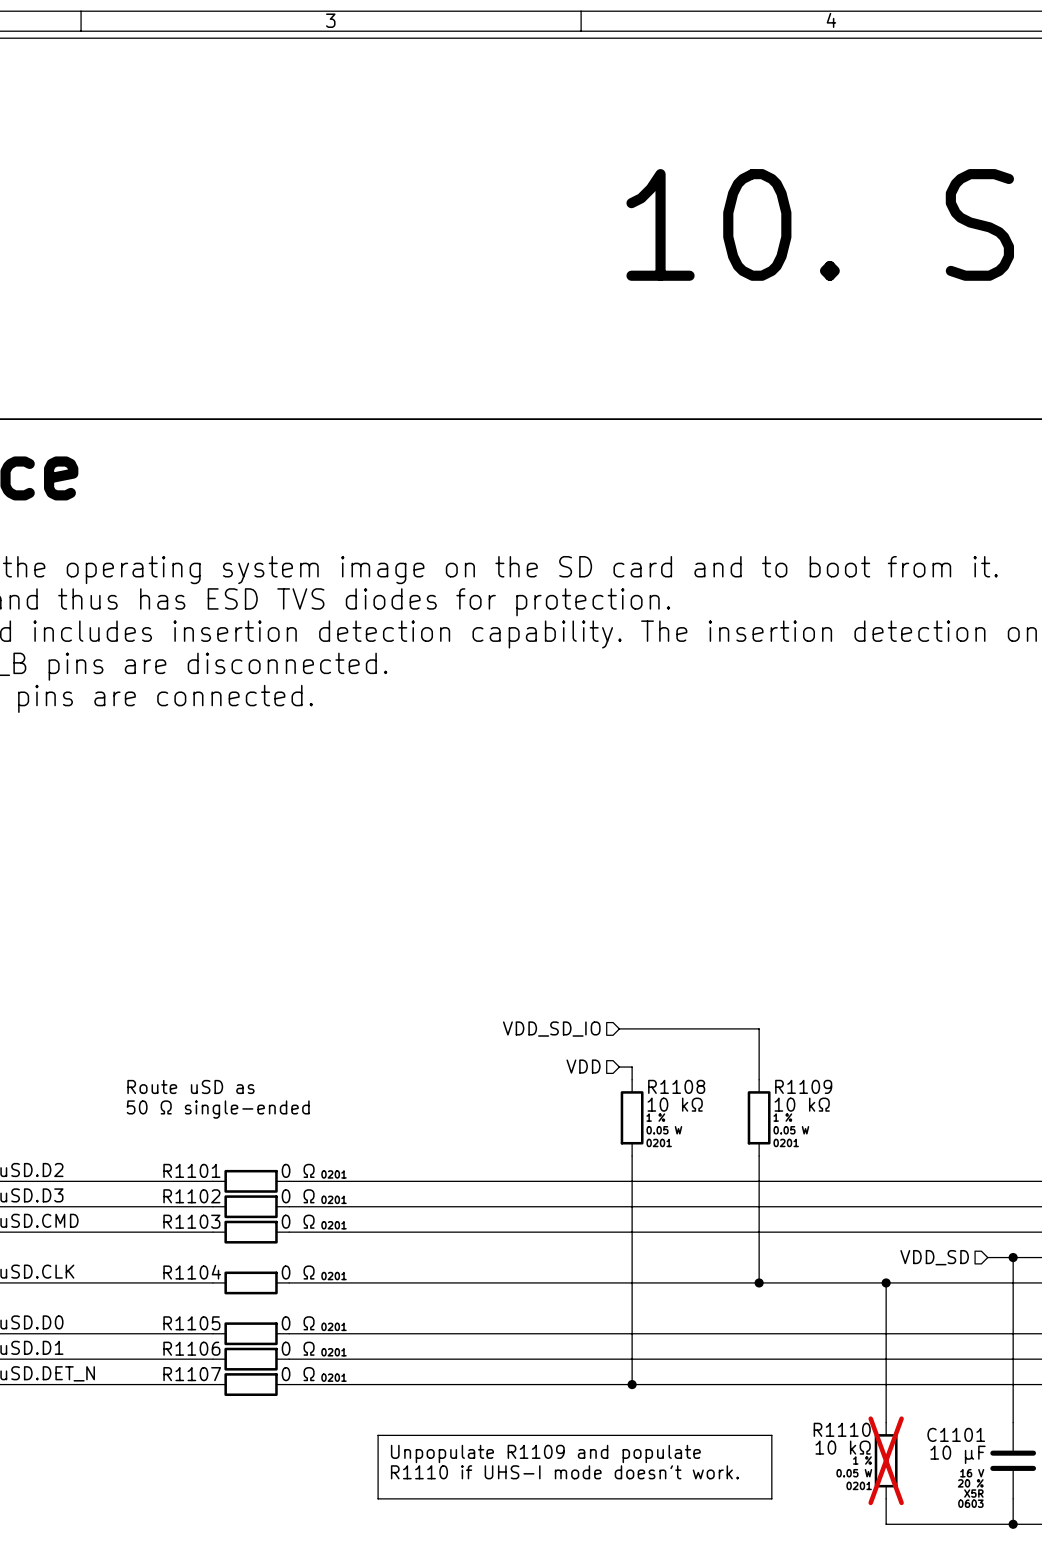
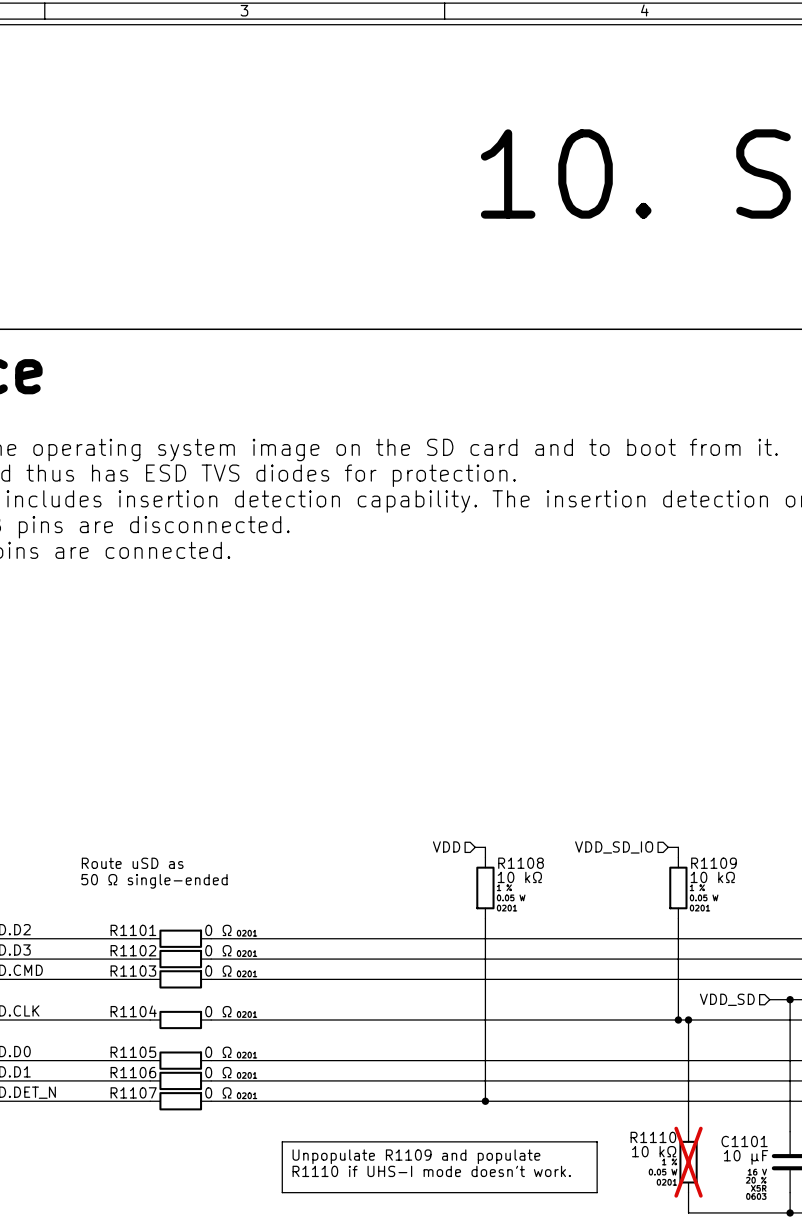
wire: (619, 1028) (759, 1028) (759, 1079) -> none
hierarchical label position: VDD_SD_IO (551, 1029) -> VDD_SD_IO (614, 847)
wire: none -> (668, 847) (678, 847) (678, 857)
R1109 position: (759, 1117) -> (678, 887)
wire: (759, 1155) (759, 1282) -> (678, 918) (678, 1020)
junction: (759, 1282) -> none
junction: none -> (678, 1020)

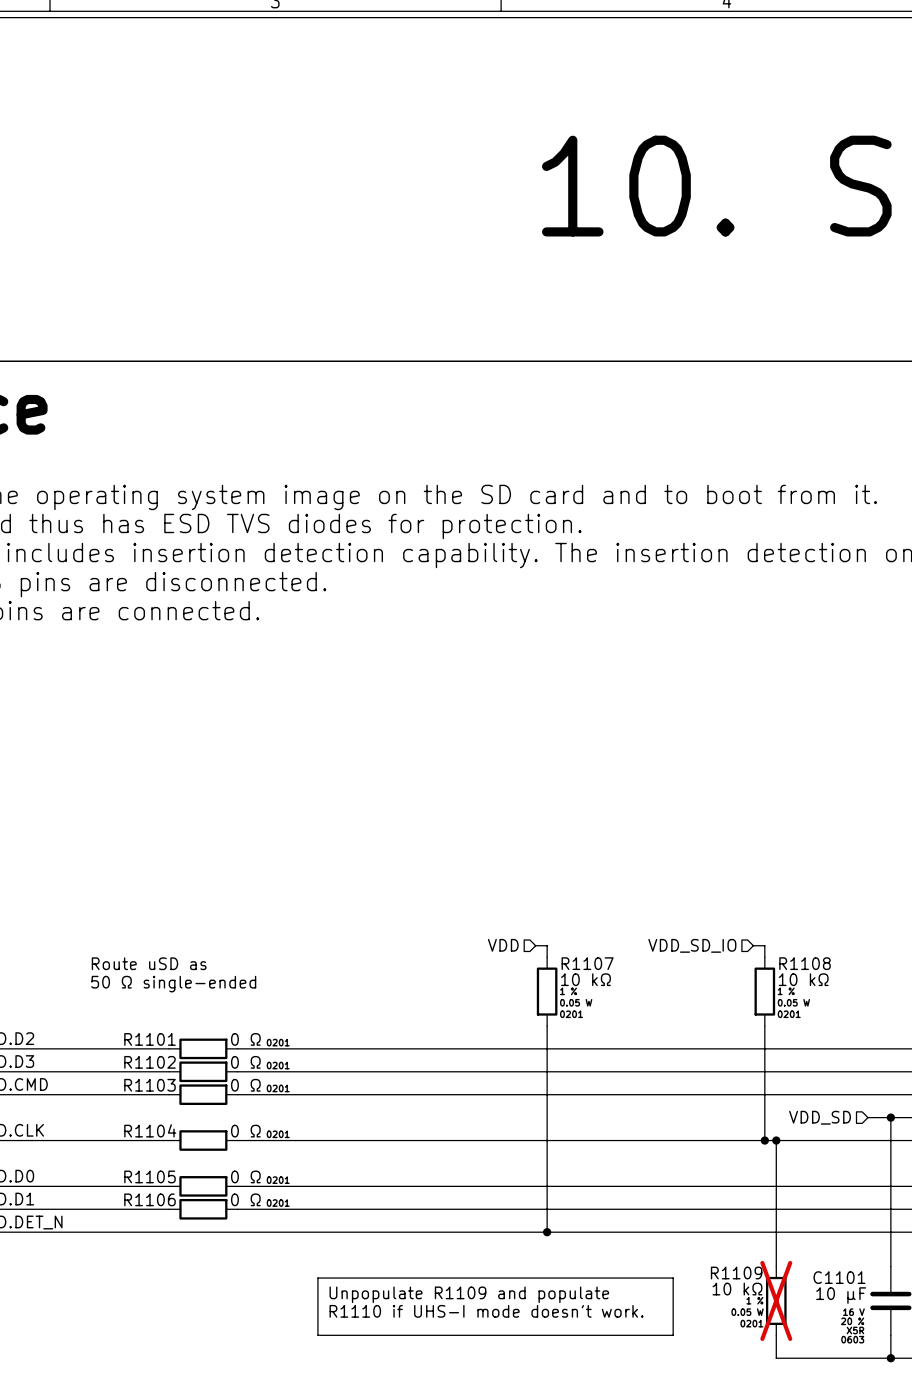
R1108 name: R1108 (521, 863) -> R1107 (587, 963)
R1109 name: R1109 (714, 863) -> R1108 (805, 963)
wire: none -> (169, 1232) (237, 1232)
R1107: 0 Ω (180, 1101) -> none
R1110 name: R1110 (653, 1137) -> R1109 (736, 1273)

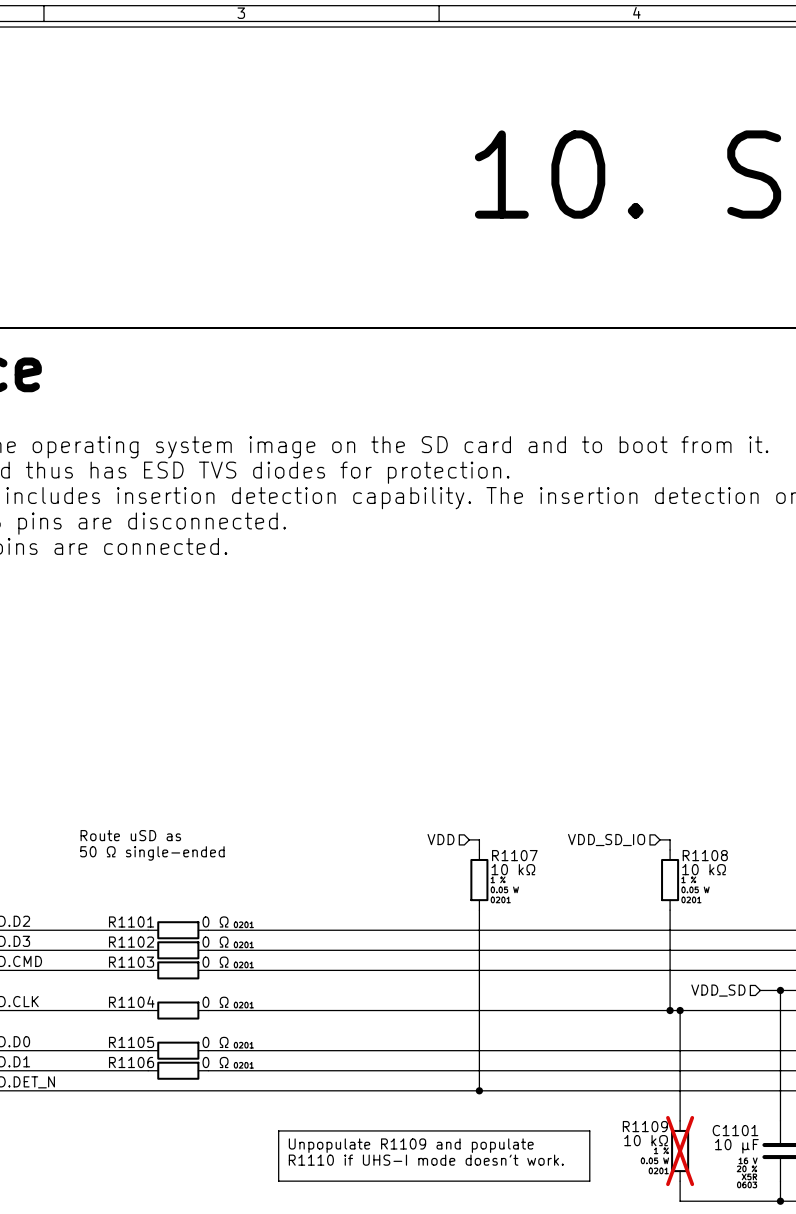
text: none -> Route uSD as (130, 835)
text: Route uSD as (149, 963) -> 50 Ω single-ended (152, 853)
text: 50 Ω single-ended (173, 984) -> none

